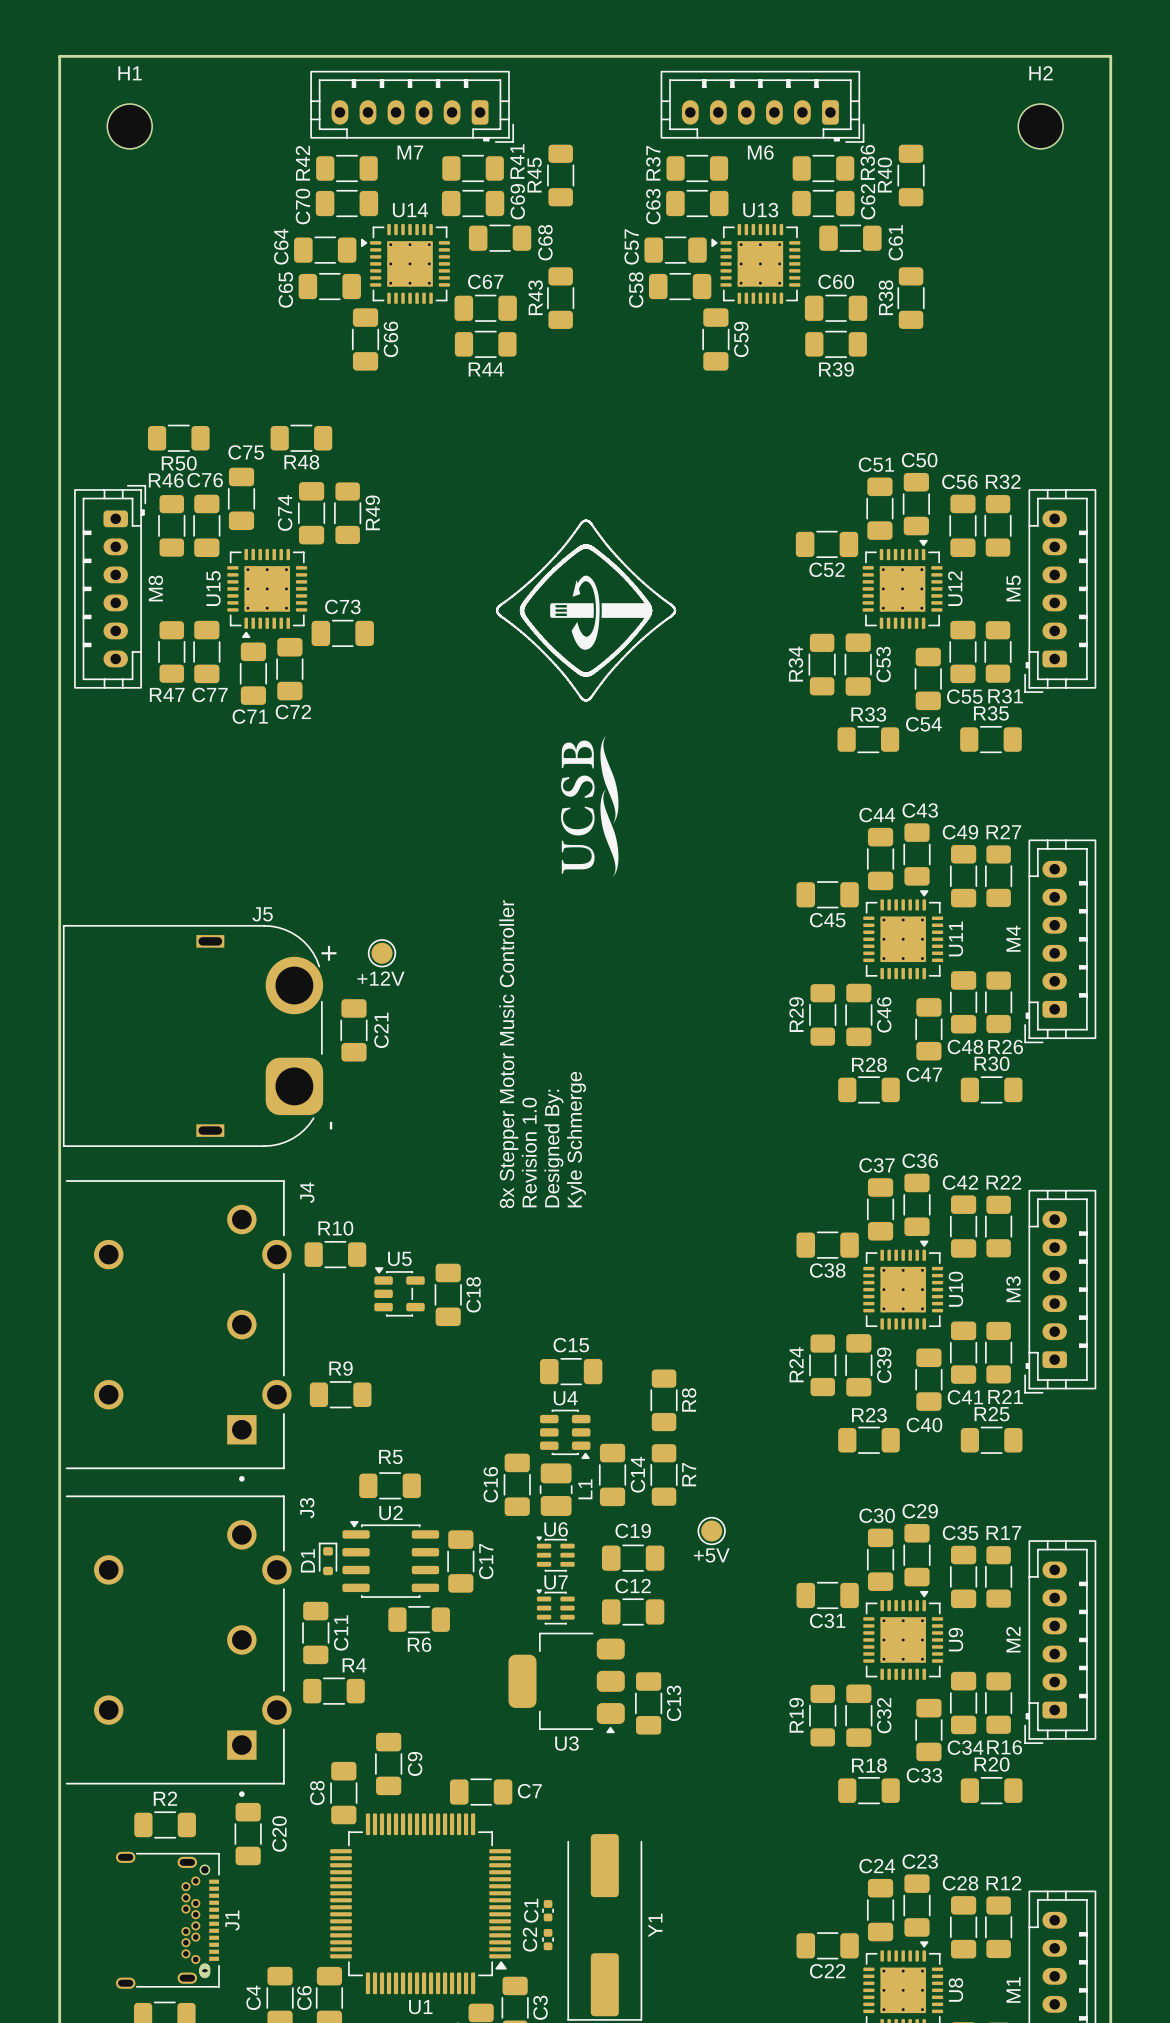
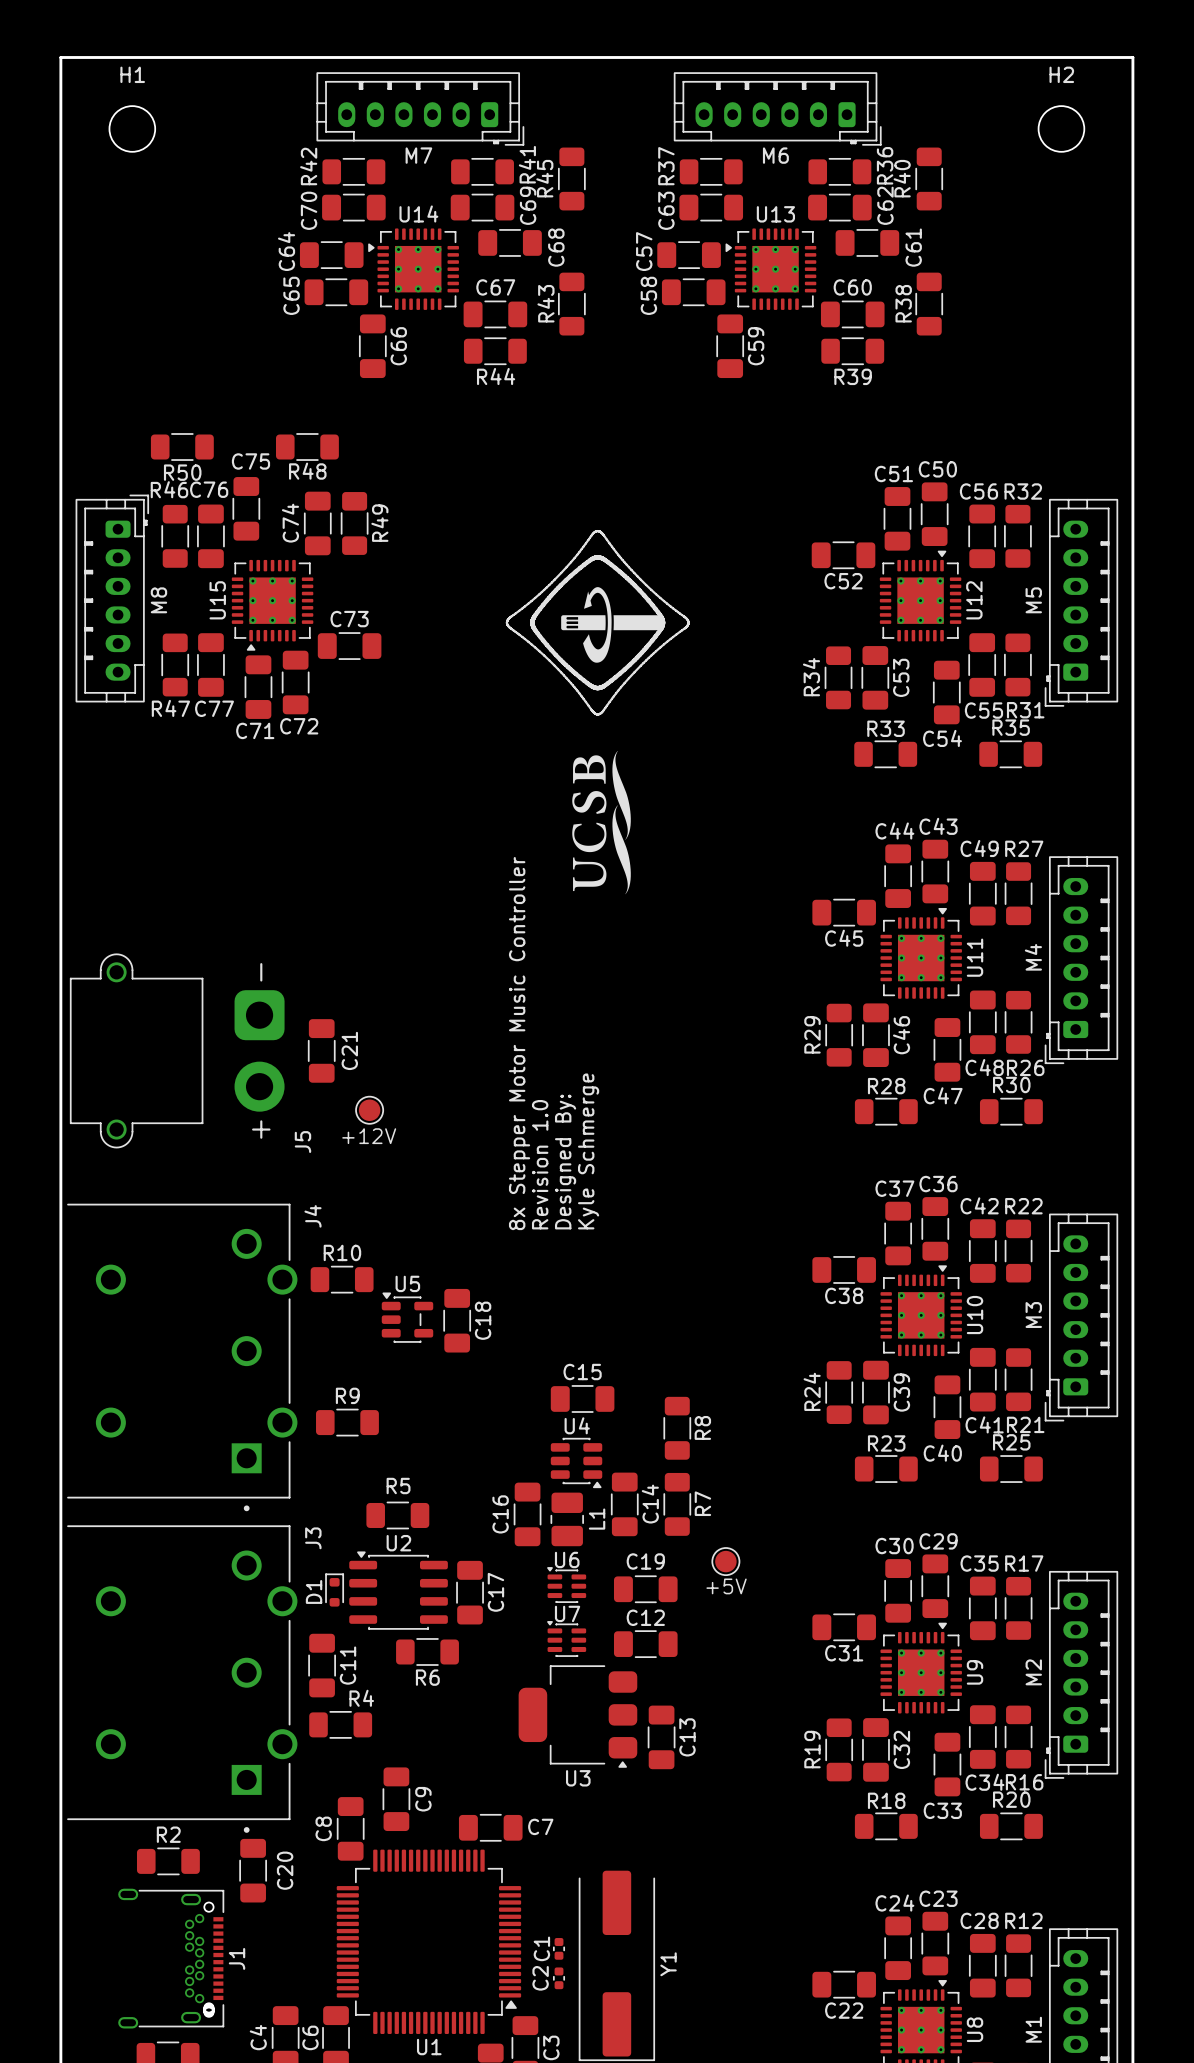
J5 name position: J5 (262, 914) -> J5 (302, 1142)
J5 footprint: [62, 924, 324, 1147] -> [69, 953, 285, 1149]
part position: (382, 953) -> (369, 1110)
text position: +12V (381, 978) -> +12V (369, 1136)
C21 position: (353, 1030) -> (321, 1050)

